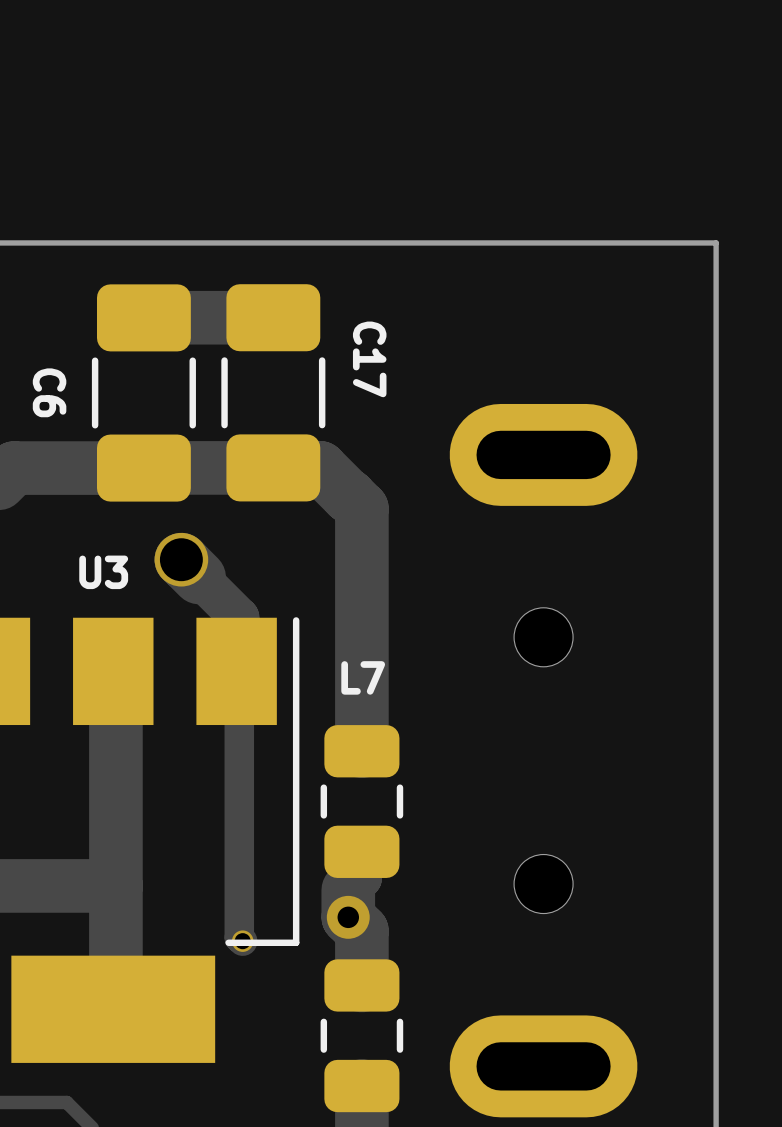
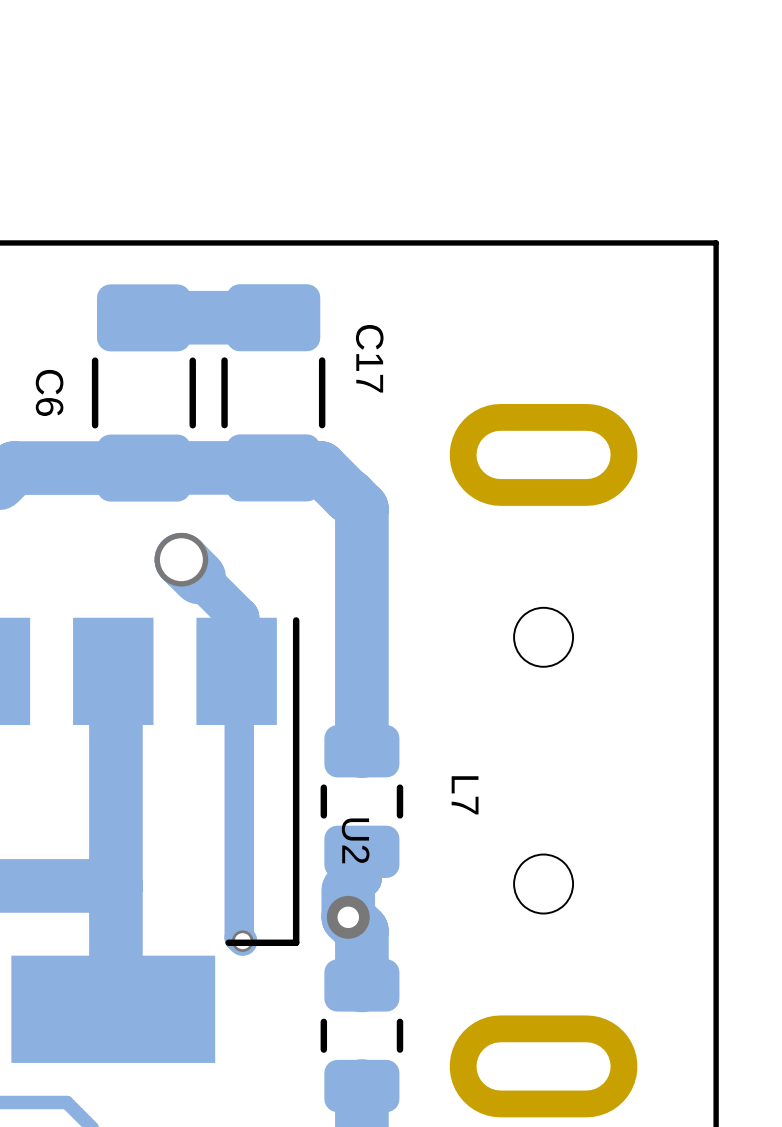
U3 name: U3 (103, 572) -> U2 (355, 840)
L7 name rotation: 0° (363, 677) -> 90° clockwise (465, 795)
L7 name position: L7 (363, 677) -> L7 (465, 795)

